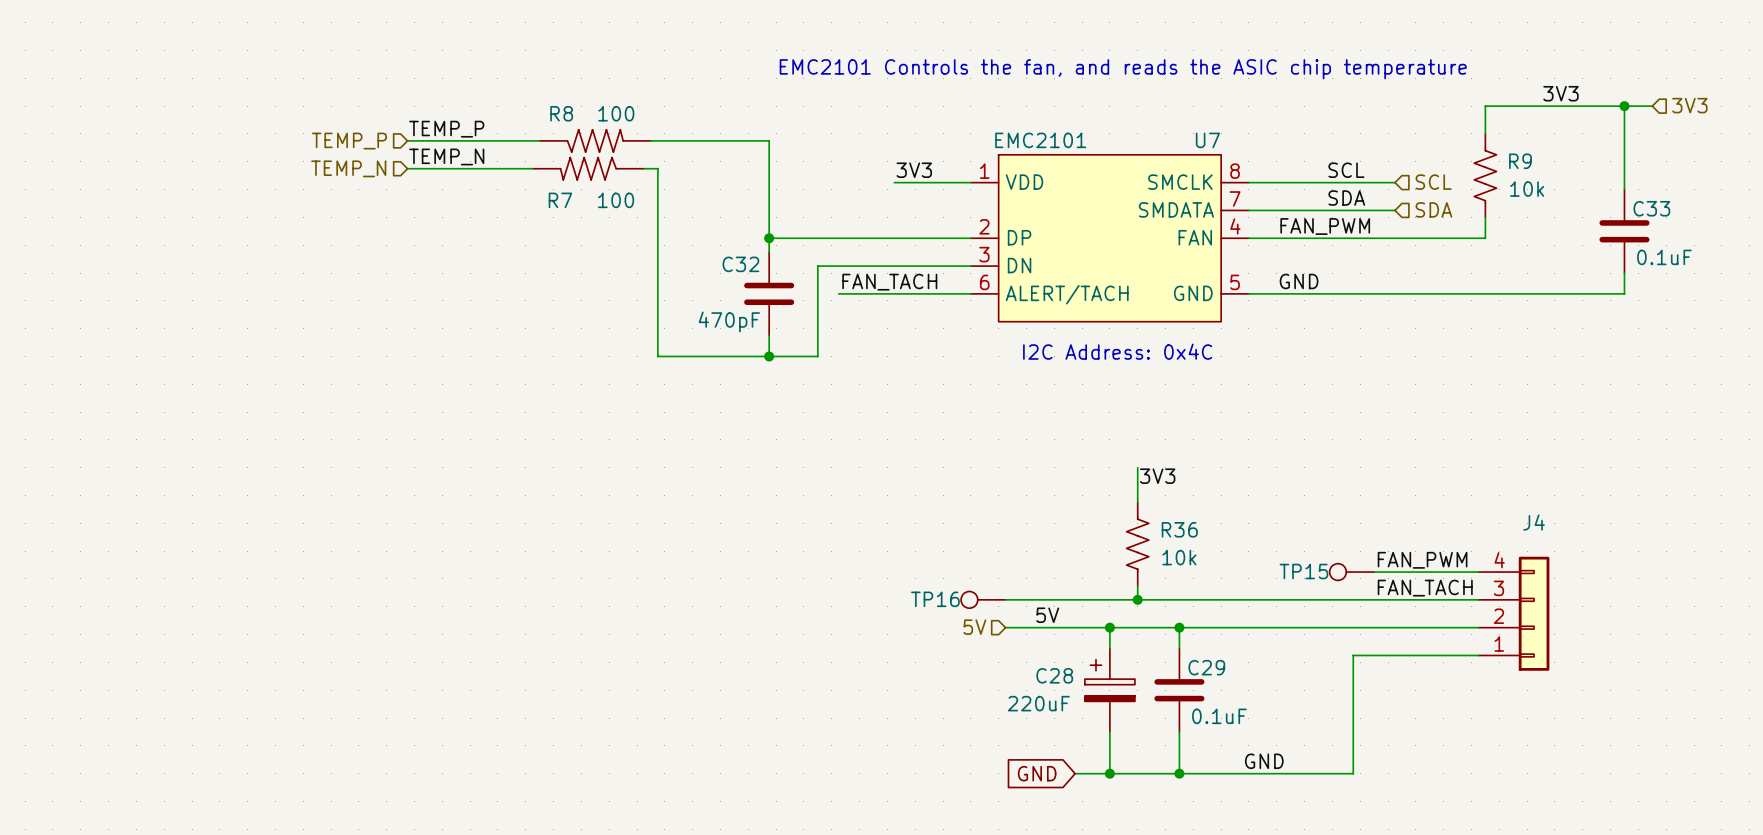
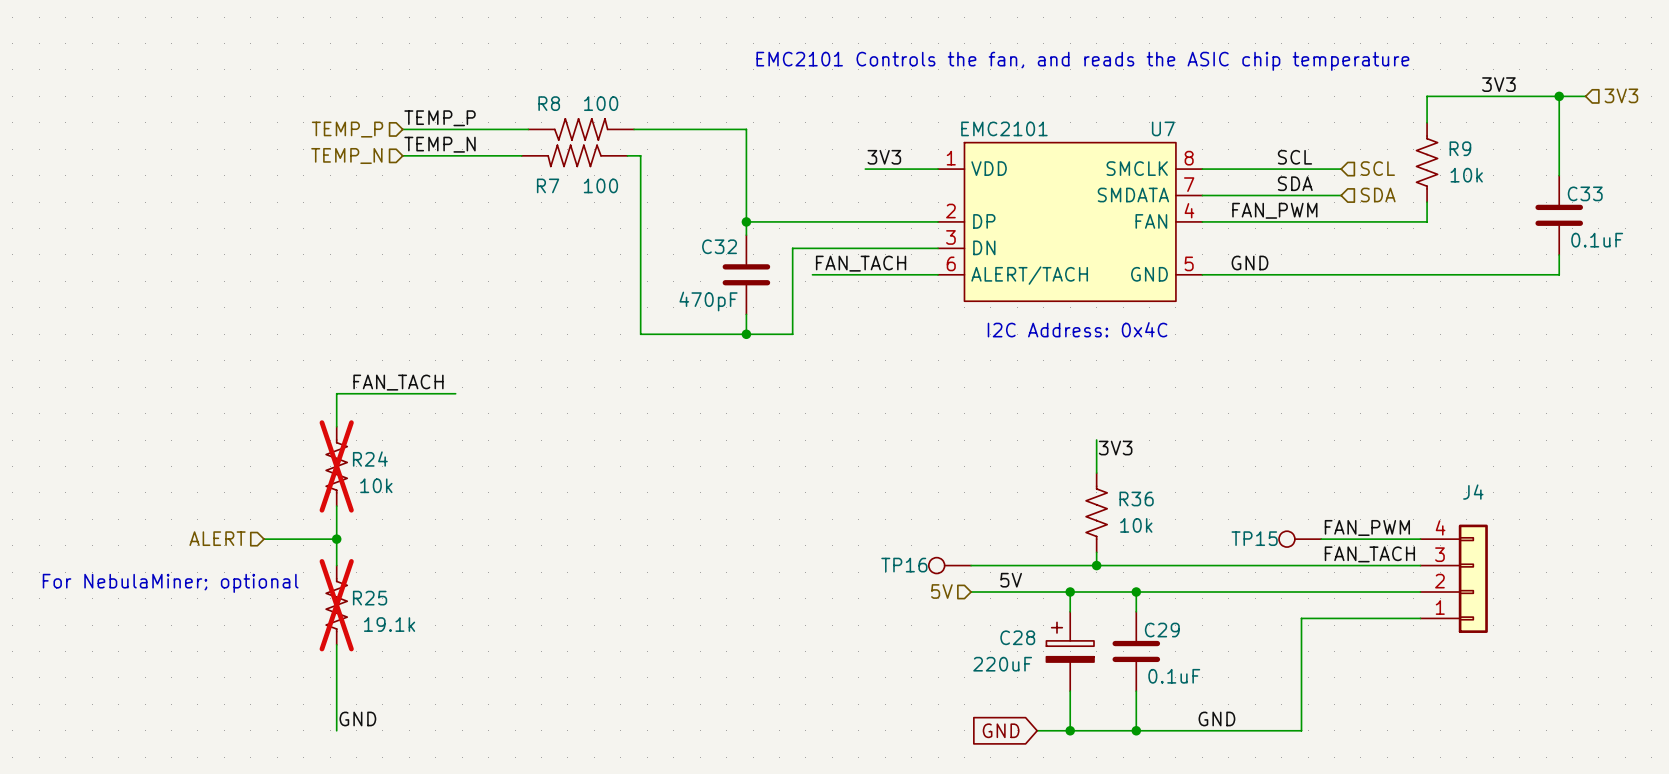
label: none -> FAN_TACH (398, 382)
wire: none -> (455, 393) (336, 393) (336, 426)
R24: none -> 10k (336, 466)
wire: none -> (336, 506) (336, 565)
hierarchical label: none -> ALERT (217, 538)
wire: none -> (264, 539) (336, 539)
junction: none -> (336, 539)
text: none -> For NebulaMiner; optional (170, 583)
R25: none -> 19.1k (336, 605)
wire: none -> (336, 644) (336, 730)
label: none -> GND (357, 718)

